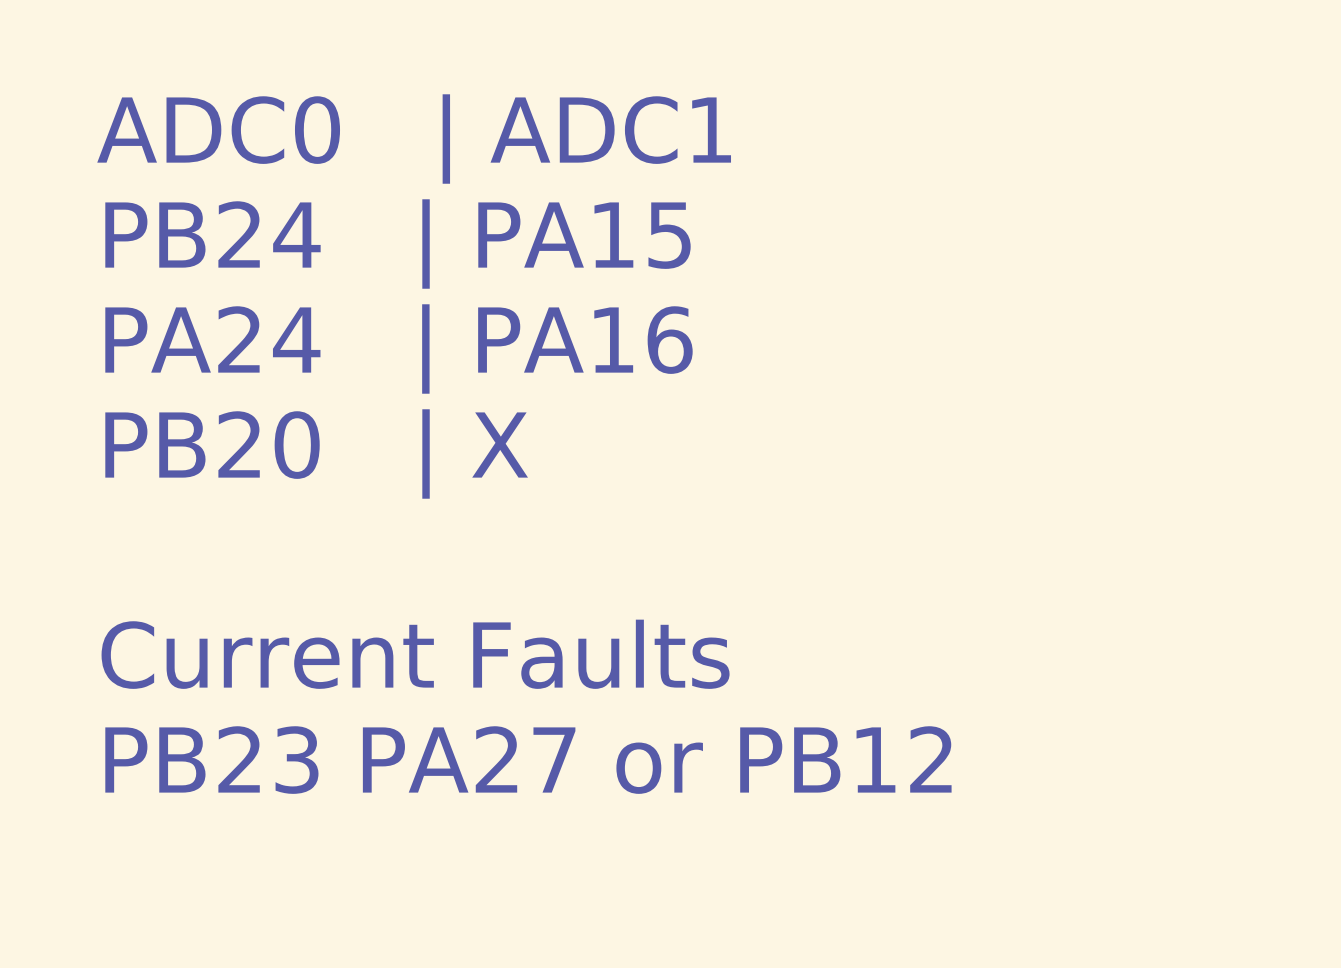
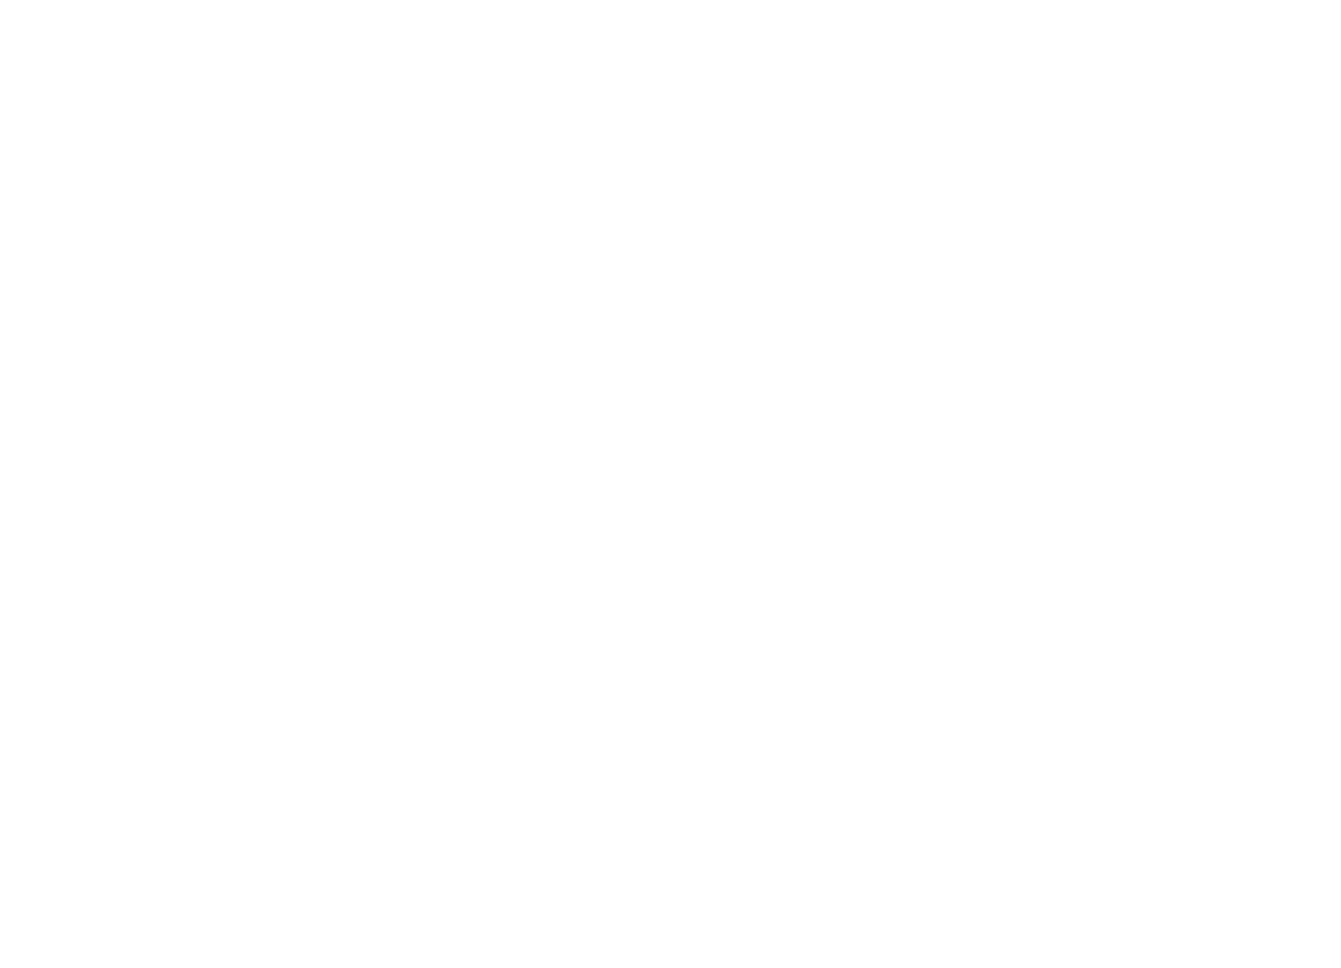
text: ADC0 | ADC1 (414, 139) -> none
text: PB24 | PA15 (397, 244) -> none
text: PA24 | PA16 (398, 349) -> none
text: PB20 | X (316, 453) -> none
text: Current Faults (415, 654) -> none
text: PB23 PA27 or PB12 (528, 760) -> none

